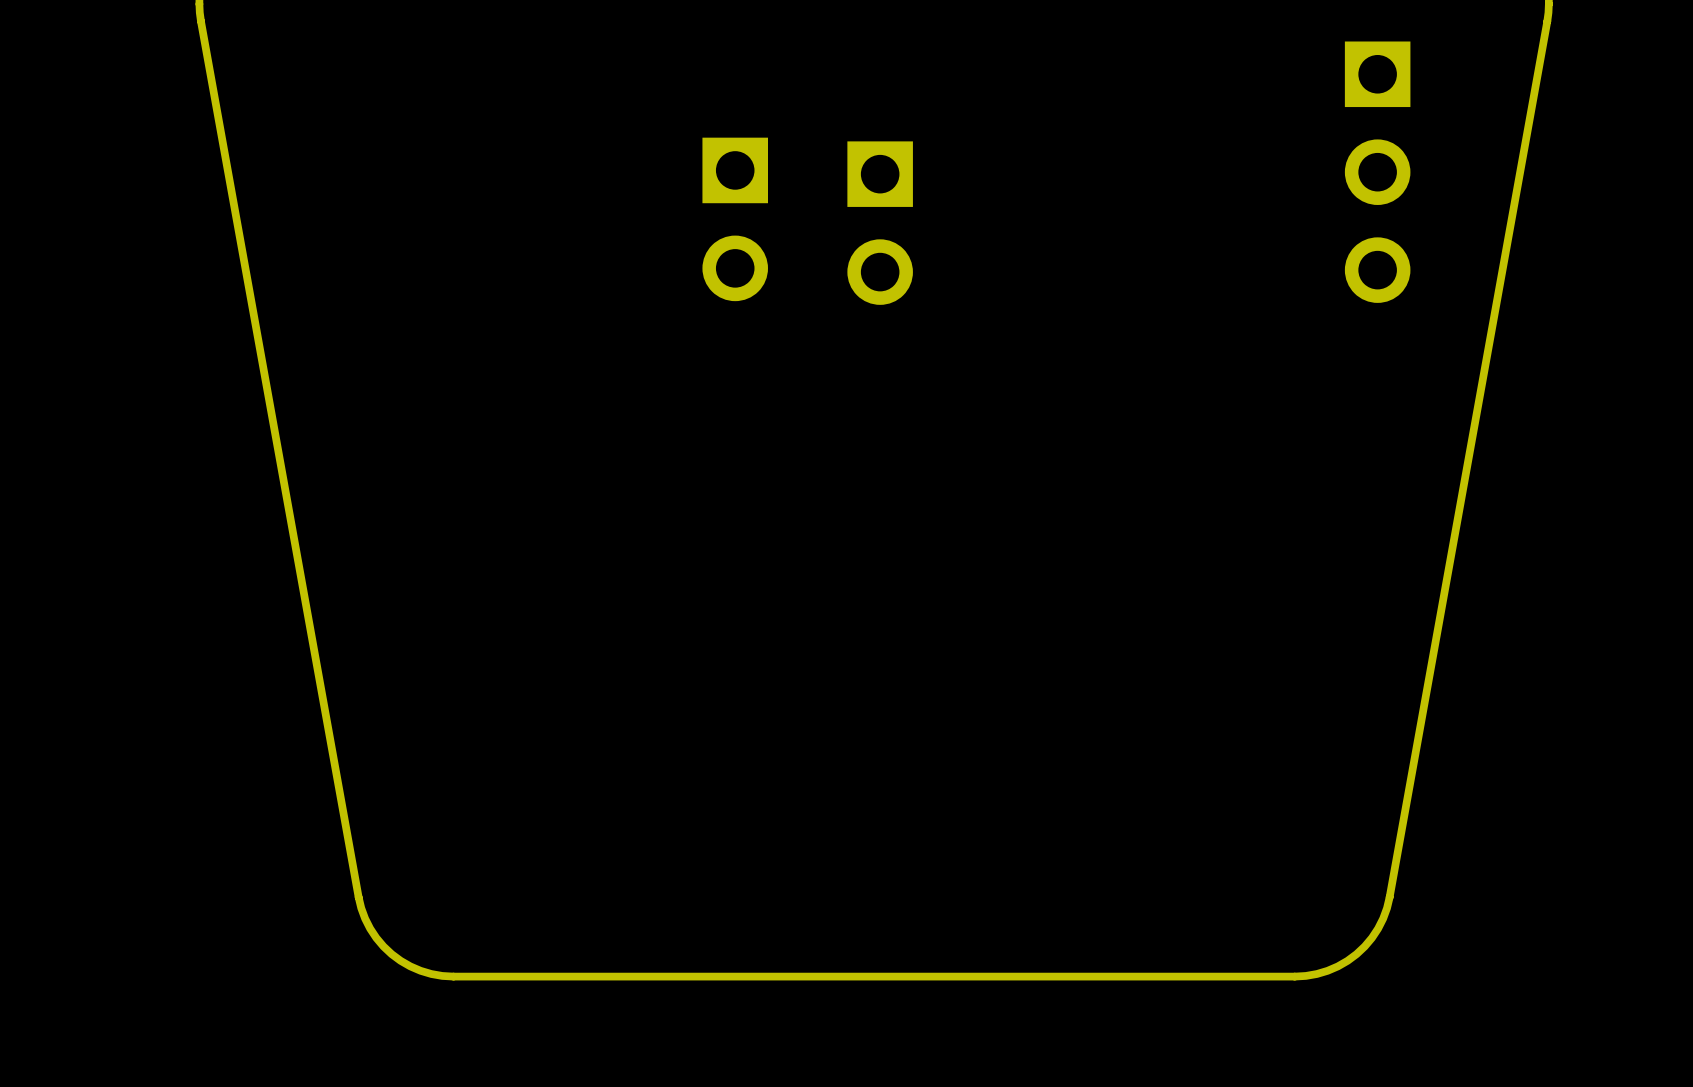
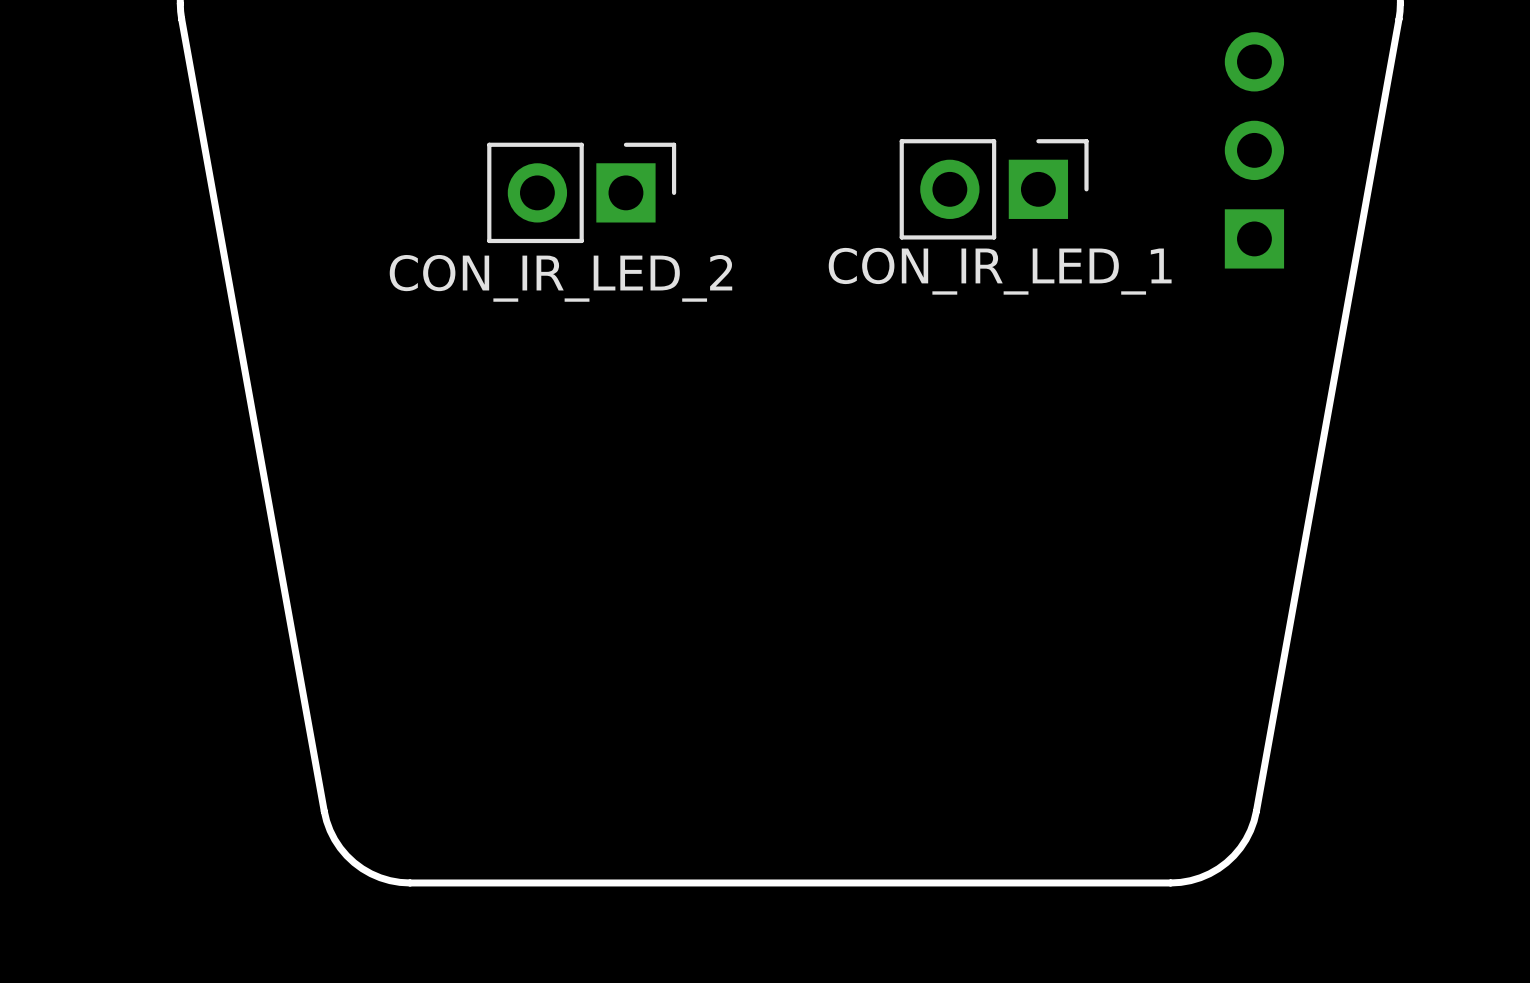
part rotation: 0° (1377, 172) -> 180° (1254, 150)
CON_IR_LED_2 side: top (735, 219) -> bottom (581, 192)
CON_IR_LED_1 side: top (880, 223) -> bottom (994, 189)

